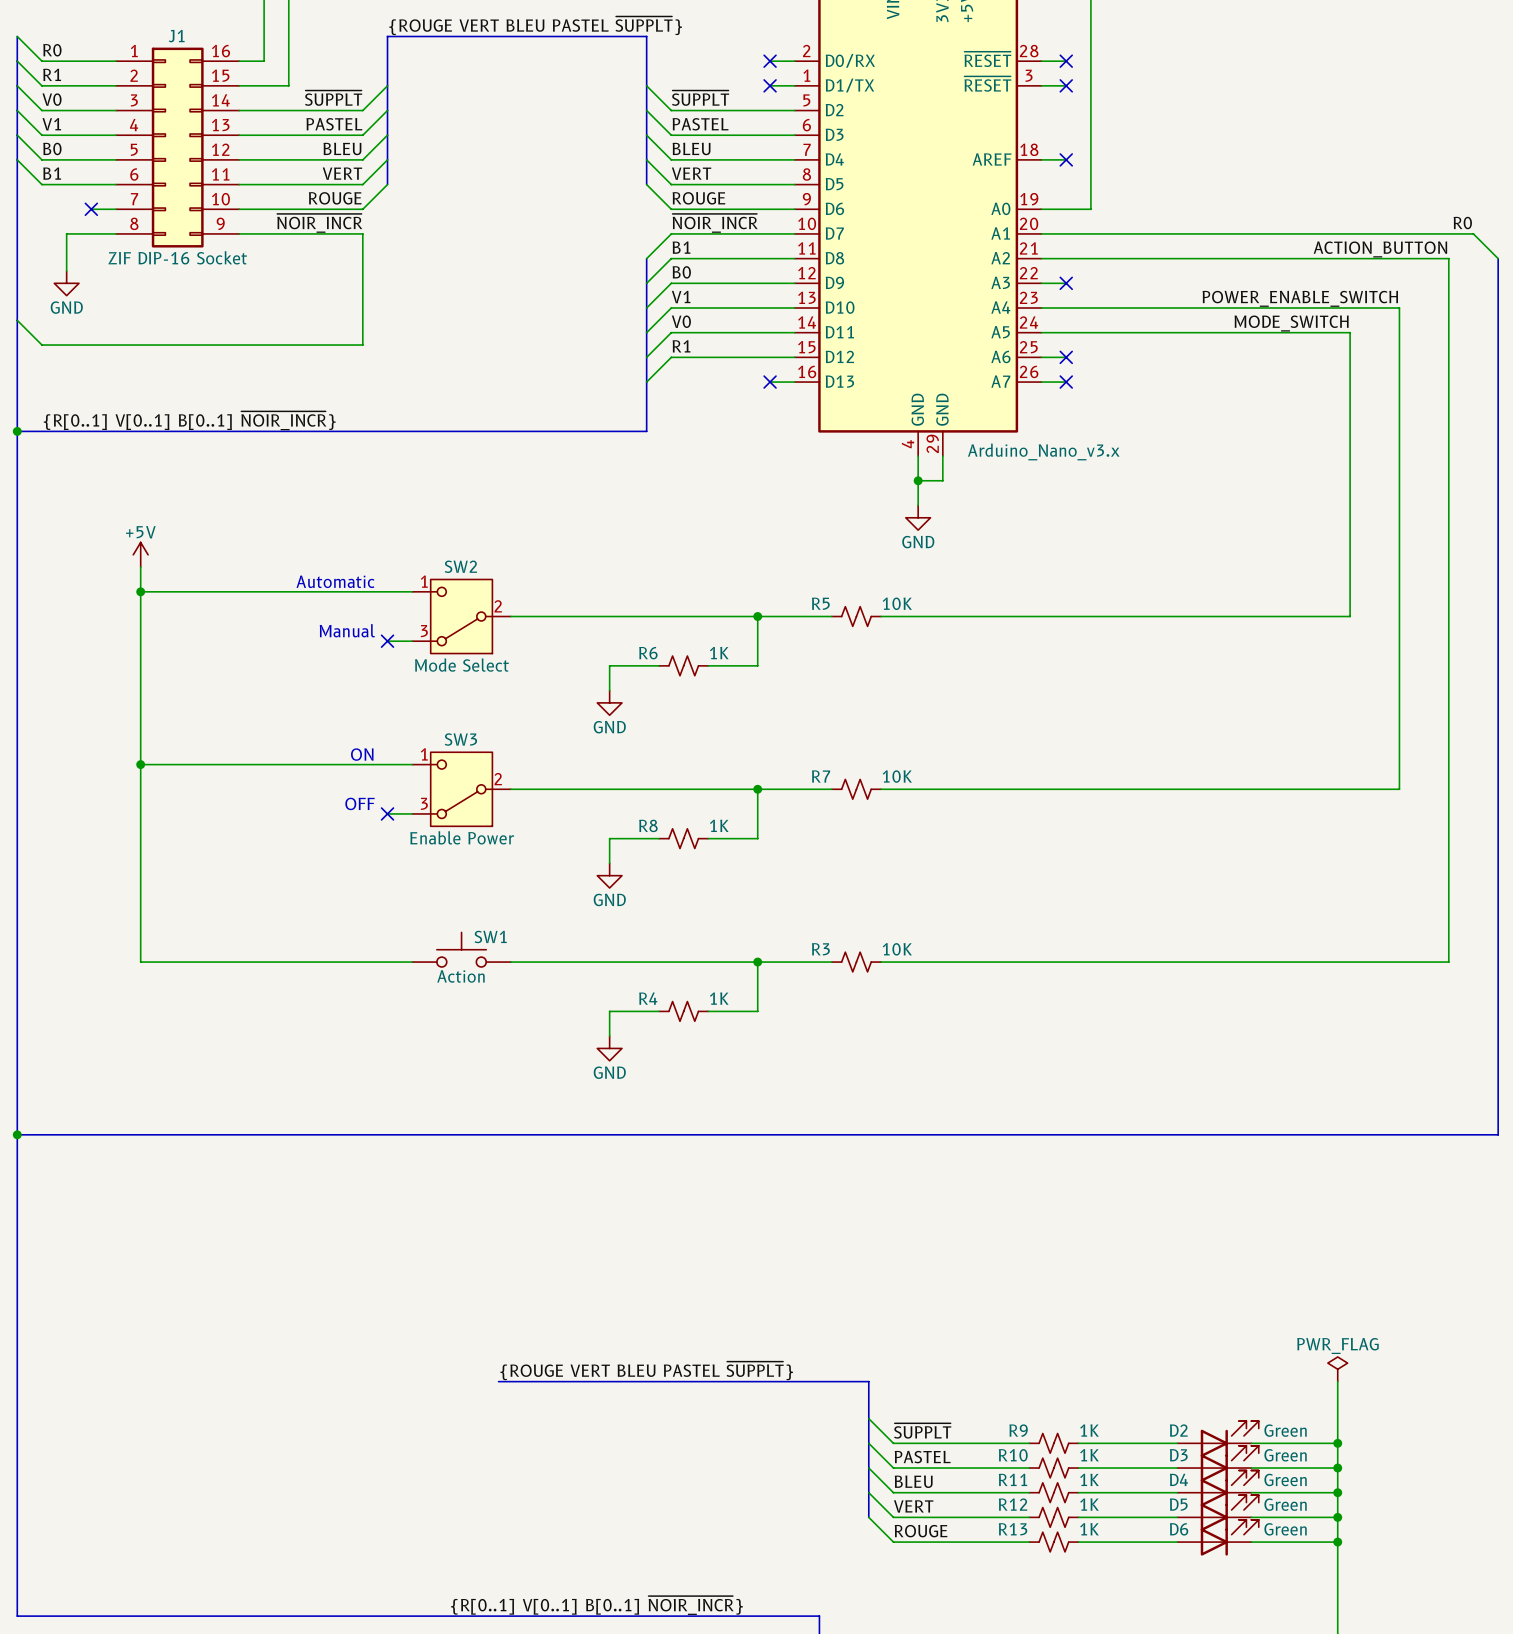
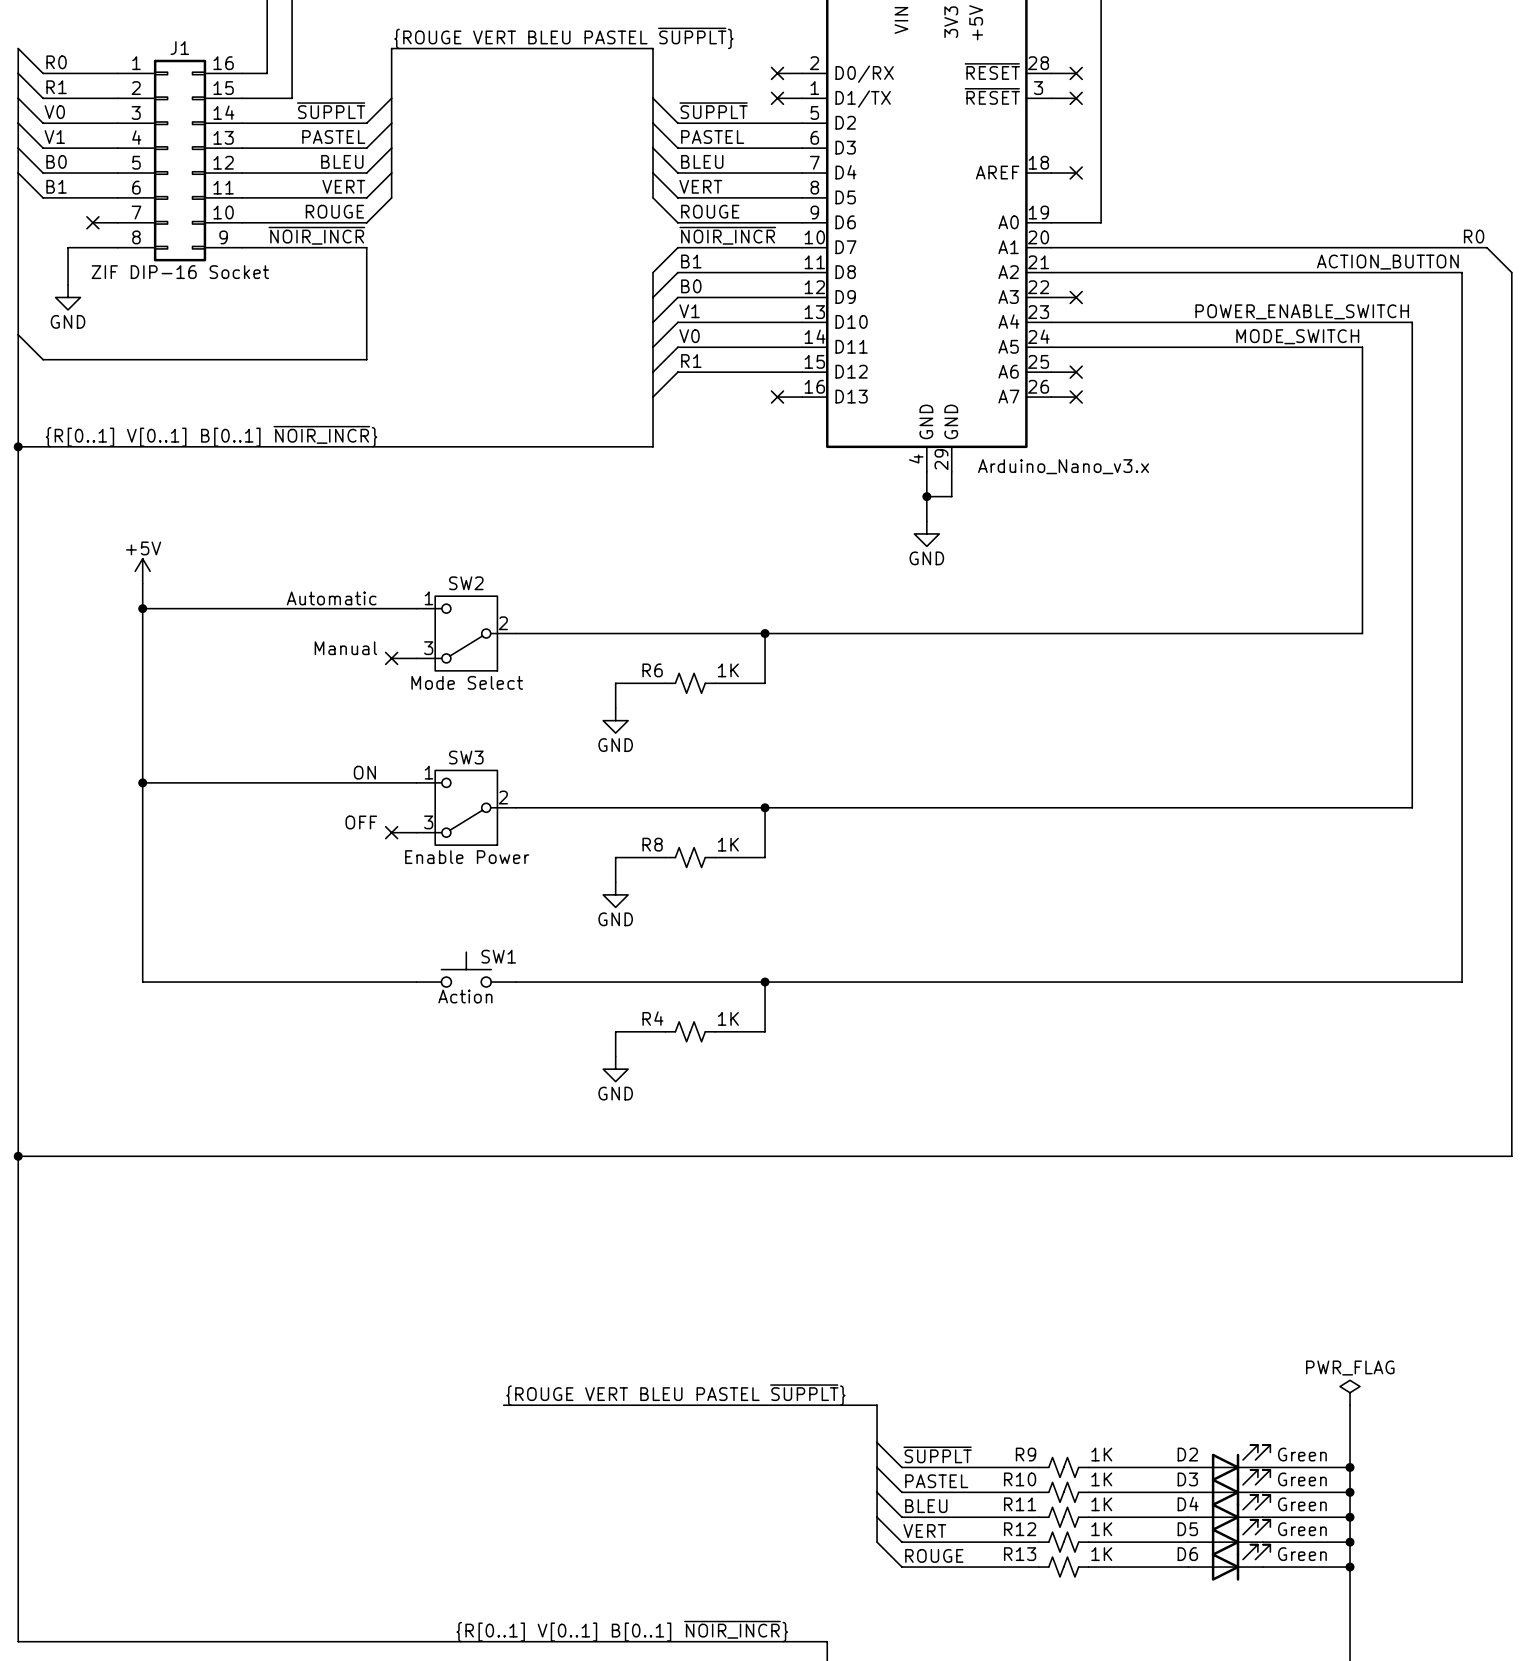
R5: 10K (856, 616) -> none
R7: 10K (856, 789) -> none
R3: 10K (856, 962) -> none

